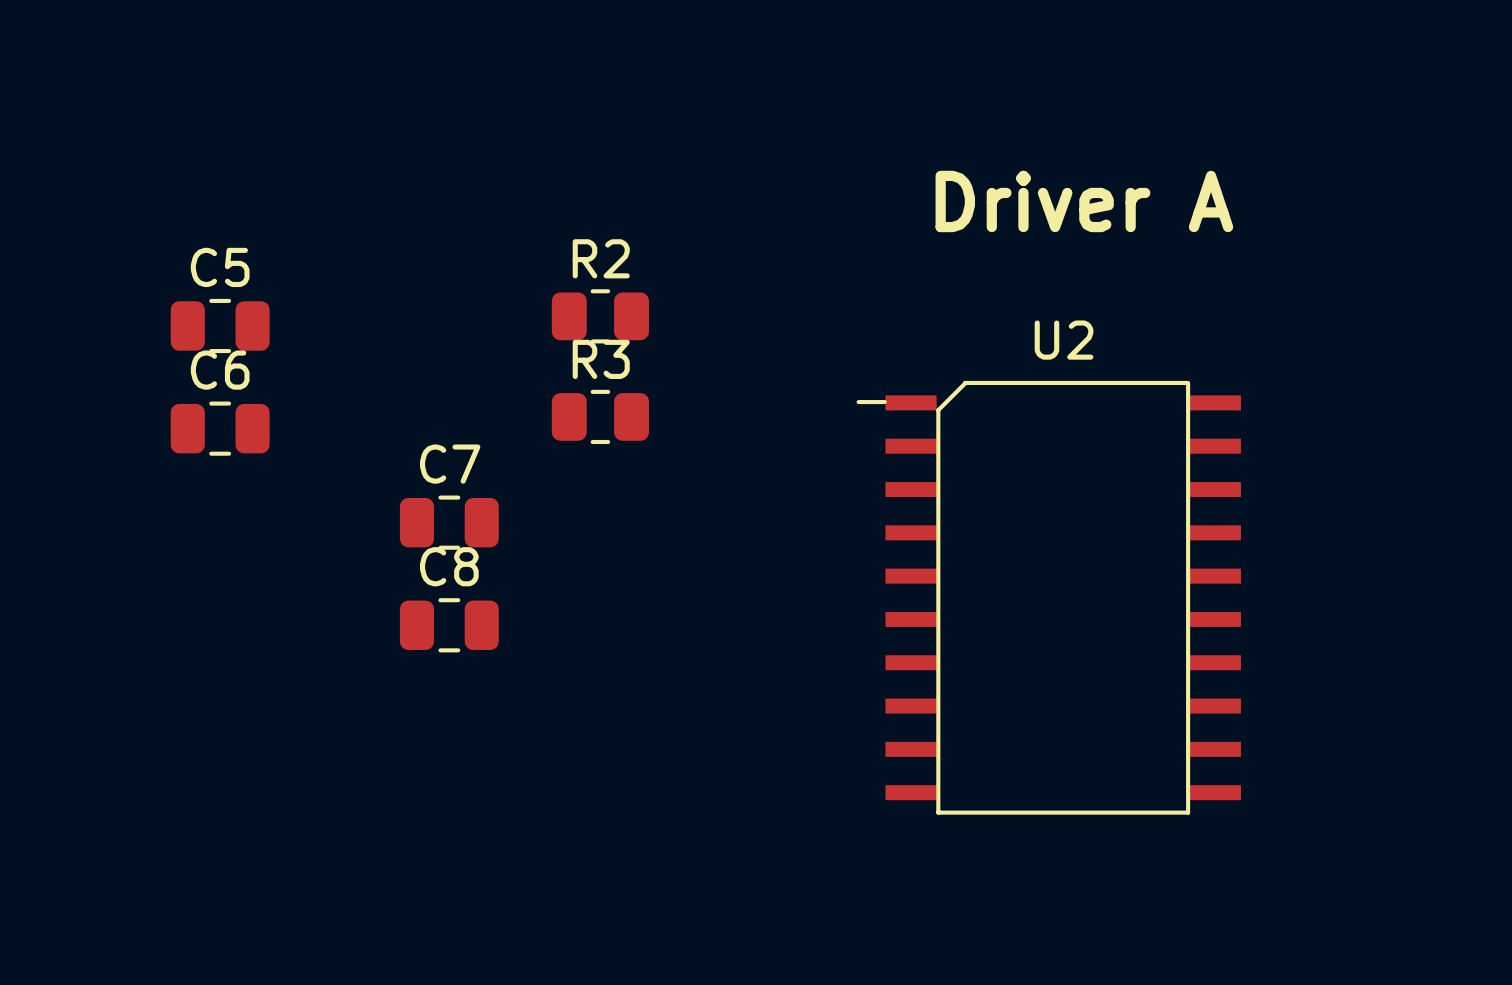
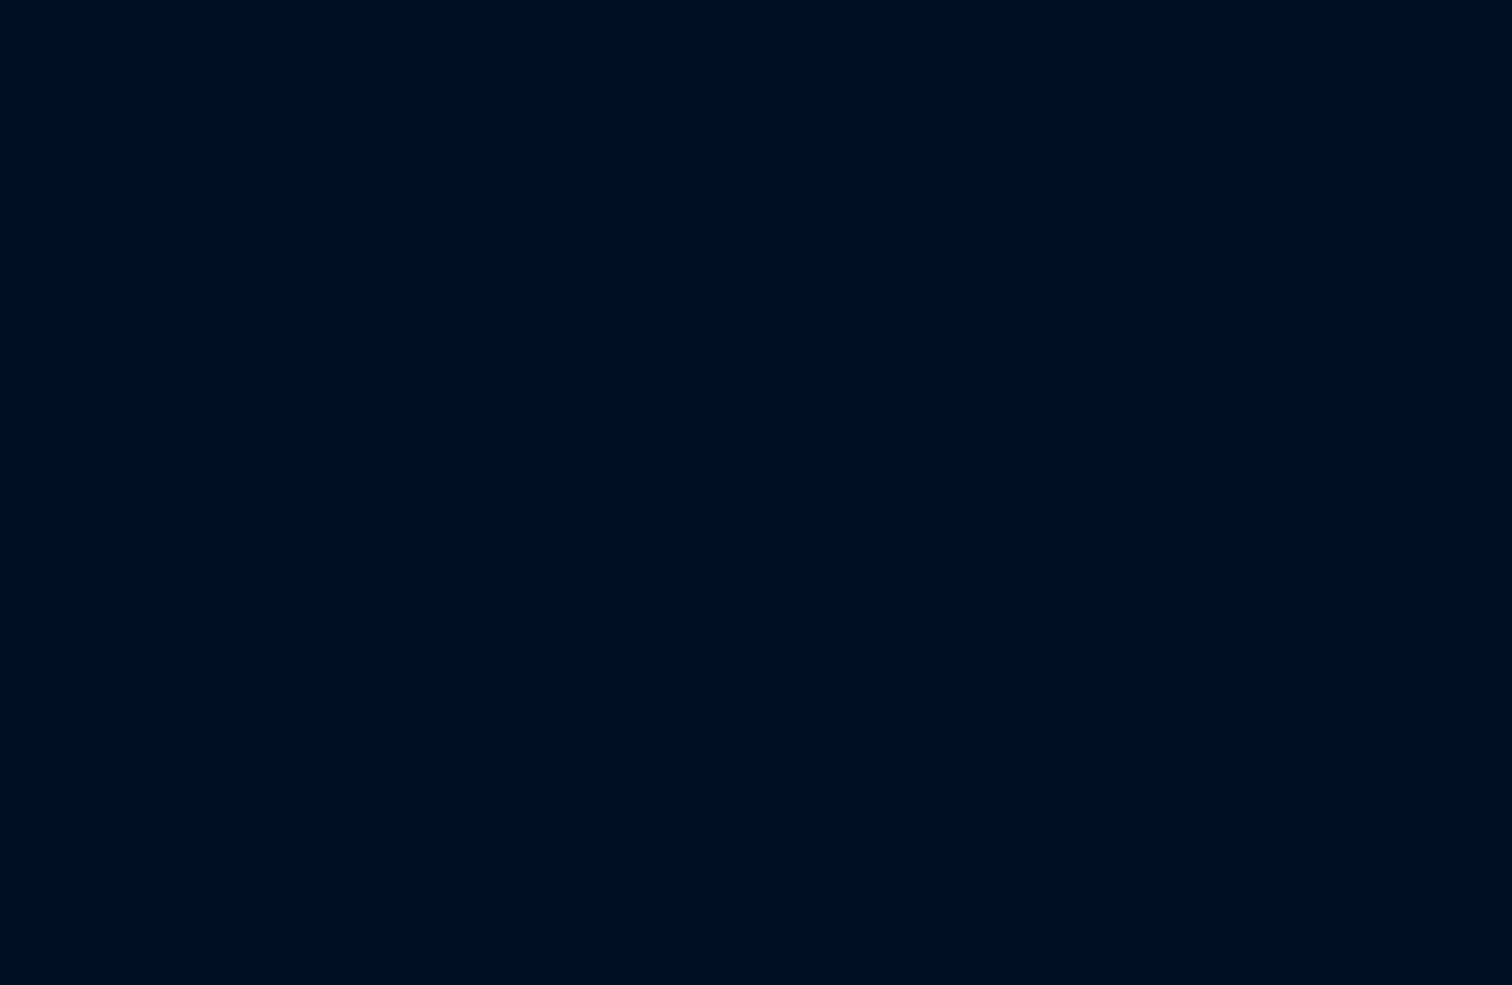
text: Driver A (1084, 201) -> none
R2: (600, 316) -> none
C5: (220, 325) -> none
R3: (600, 416) -> none
C6: (220, 428) -> none
C7: (449, 522) -> none
U2: (1048, 597) -> none
C8: (449, 625) -> none

